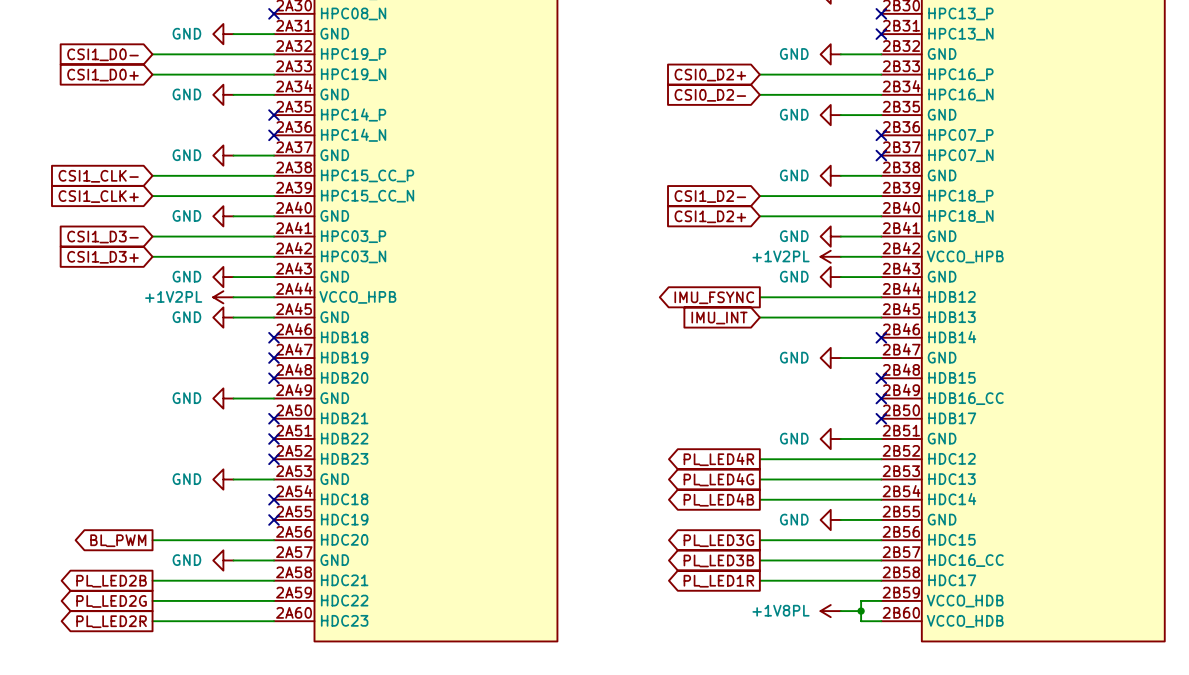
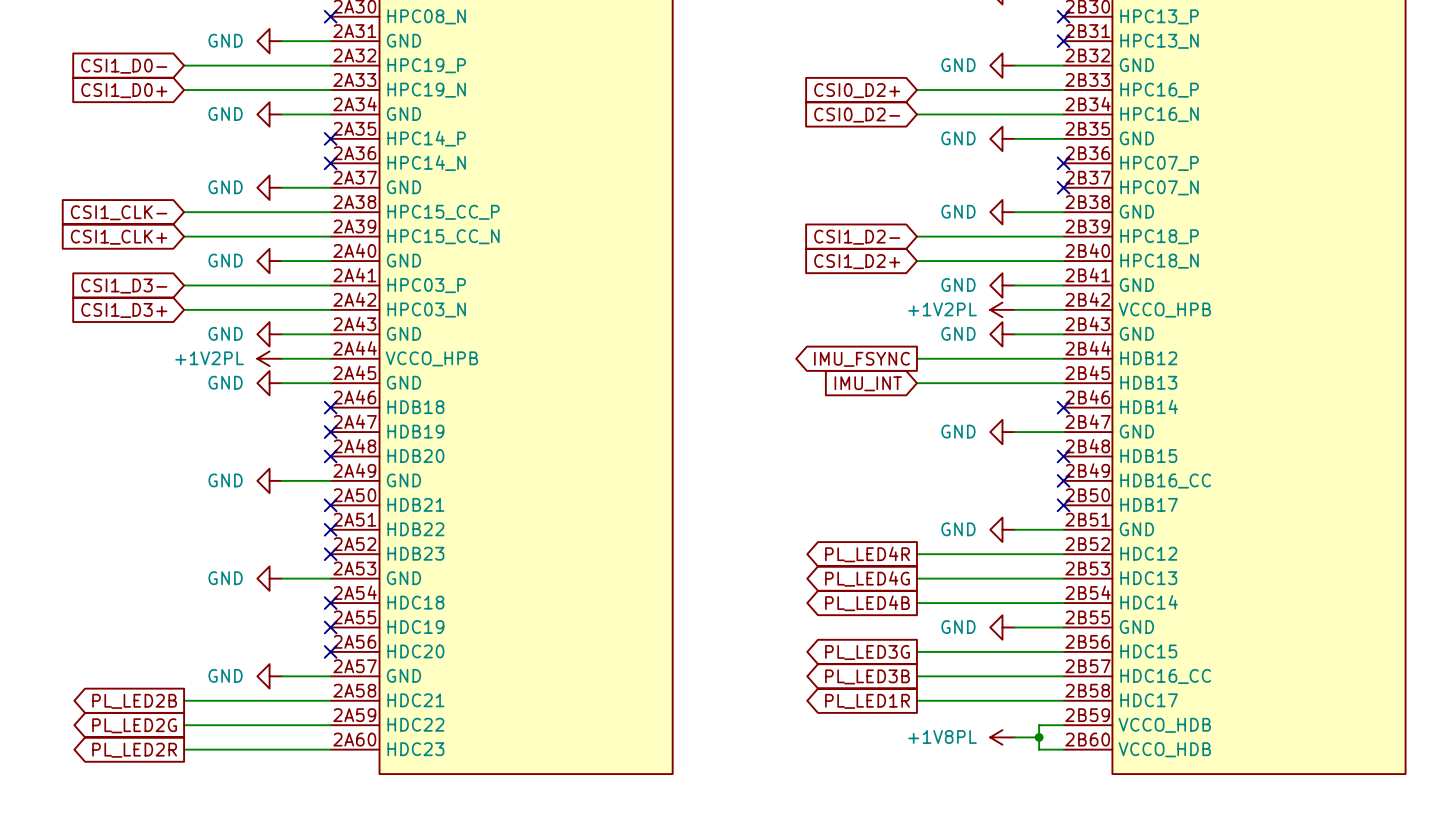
global label: BL_PWM (118, 540) -> none
wire: (152, 540) (274, 540) -> none
no-connect mark: none -> (330, 651)

